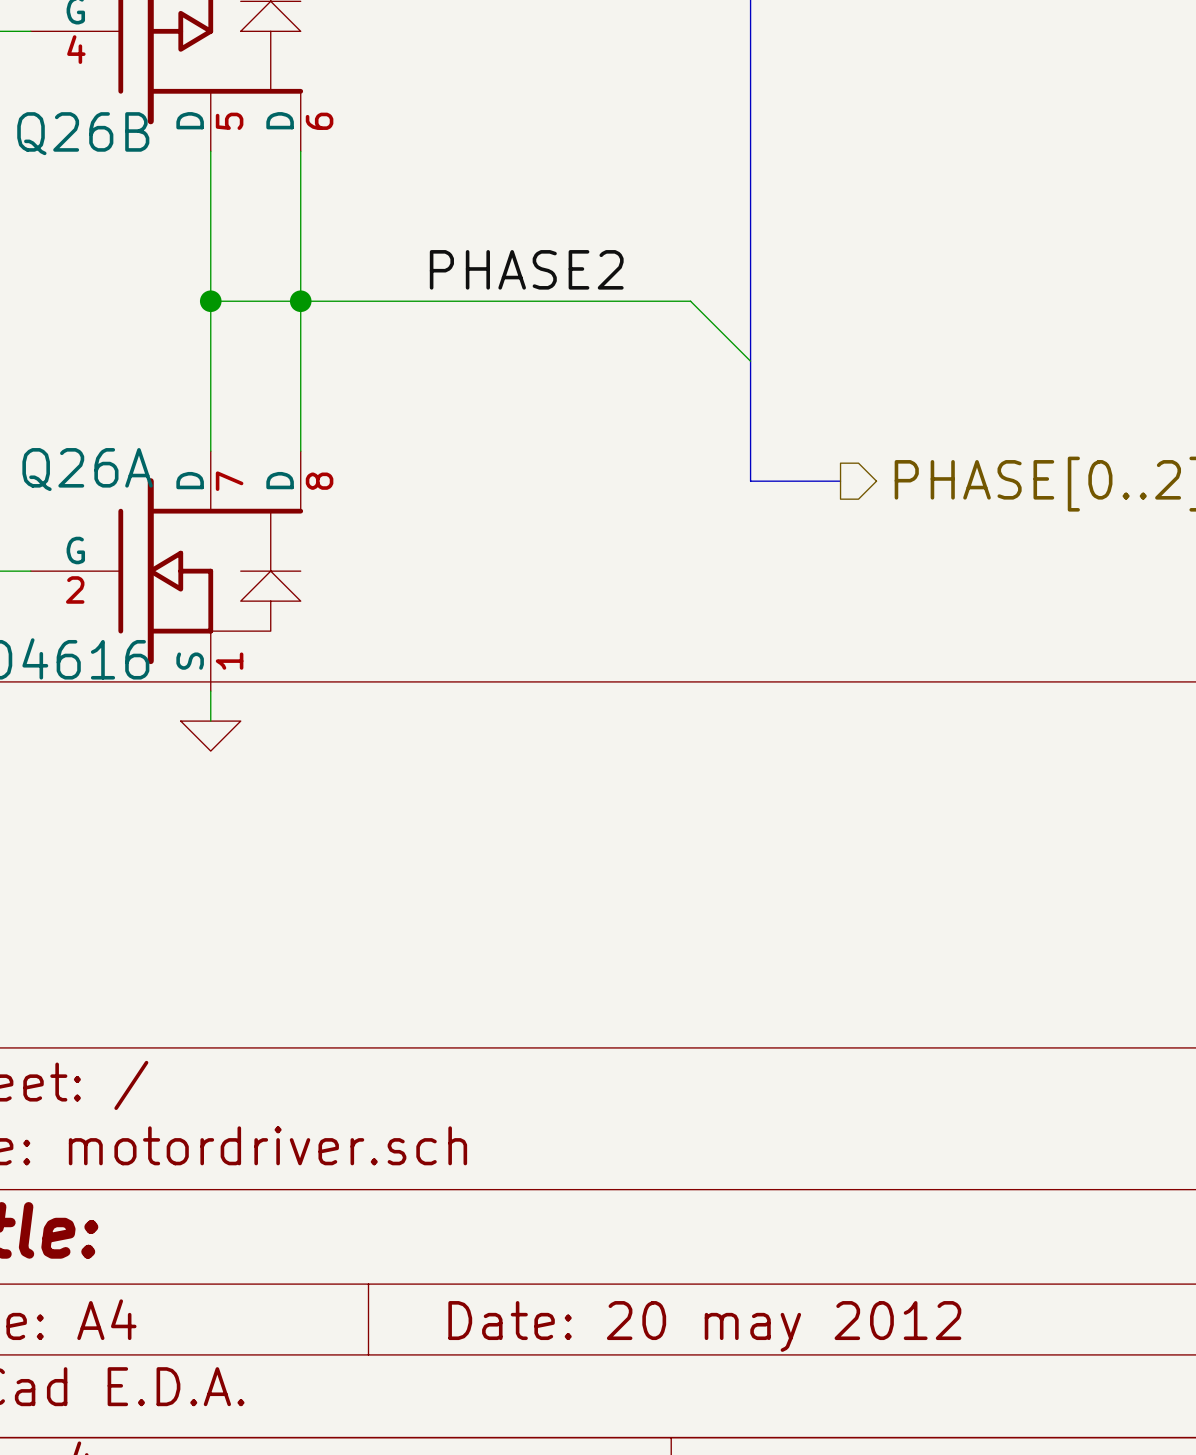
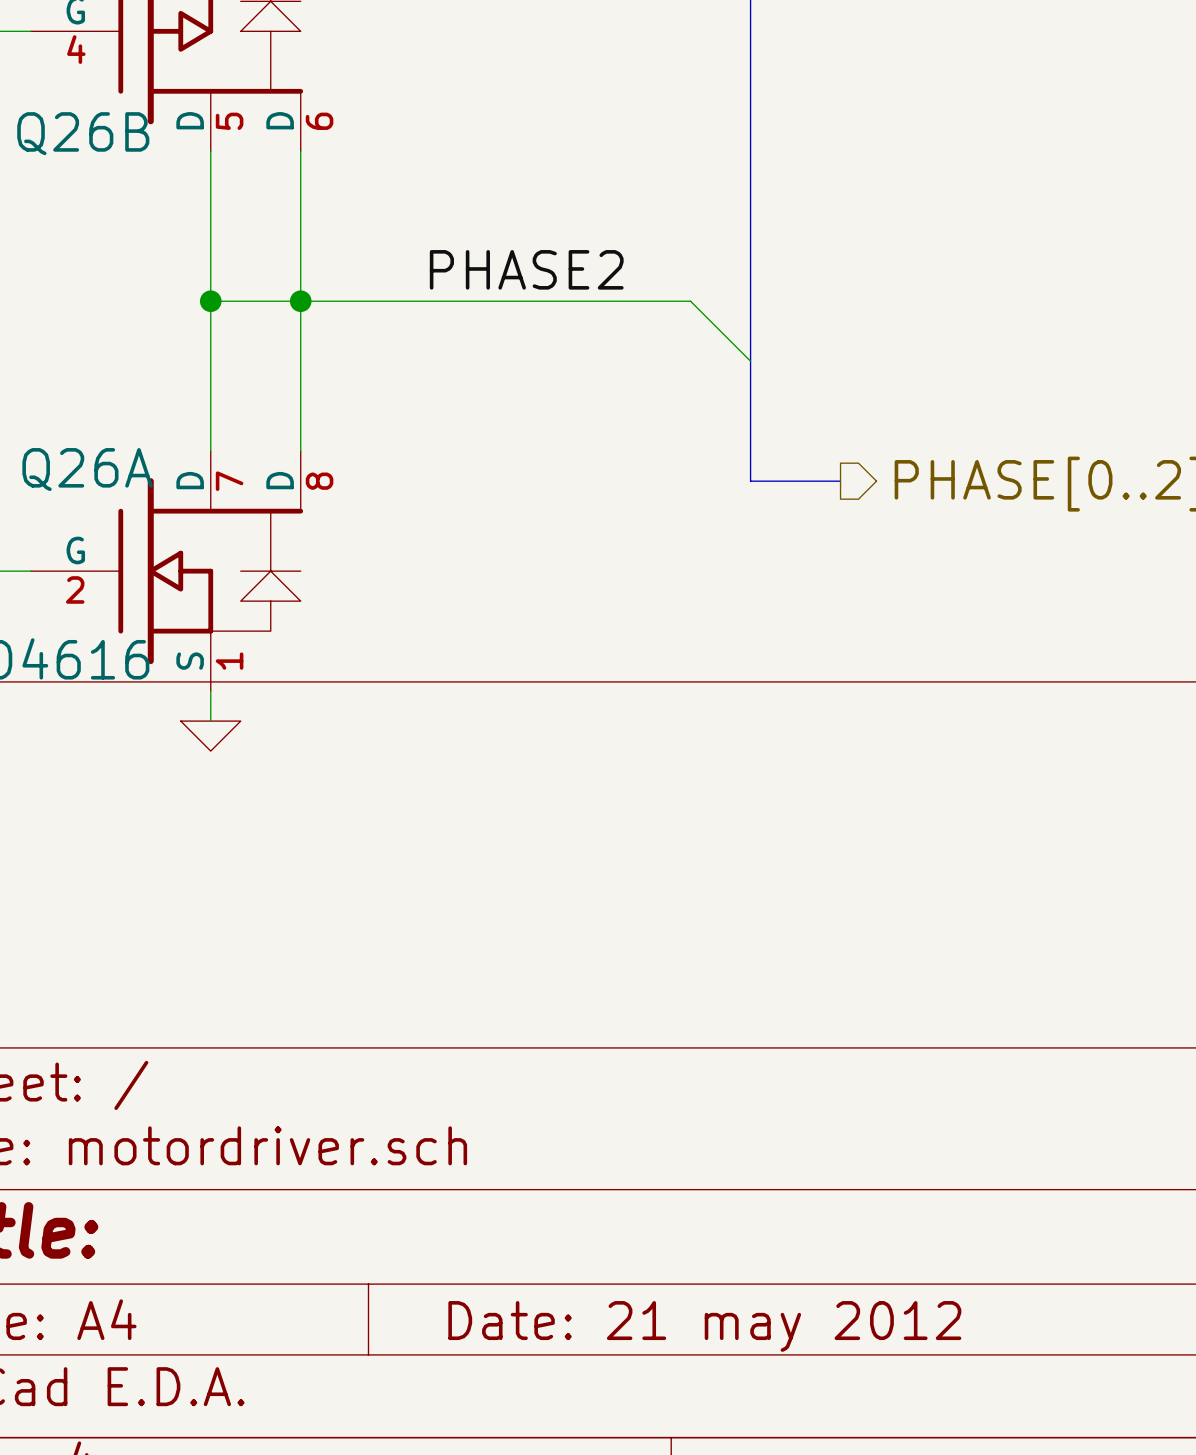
title block: Date: 20 may 2012 (704, 1326) -> Date: 21 may 2012 (704, 1326)

